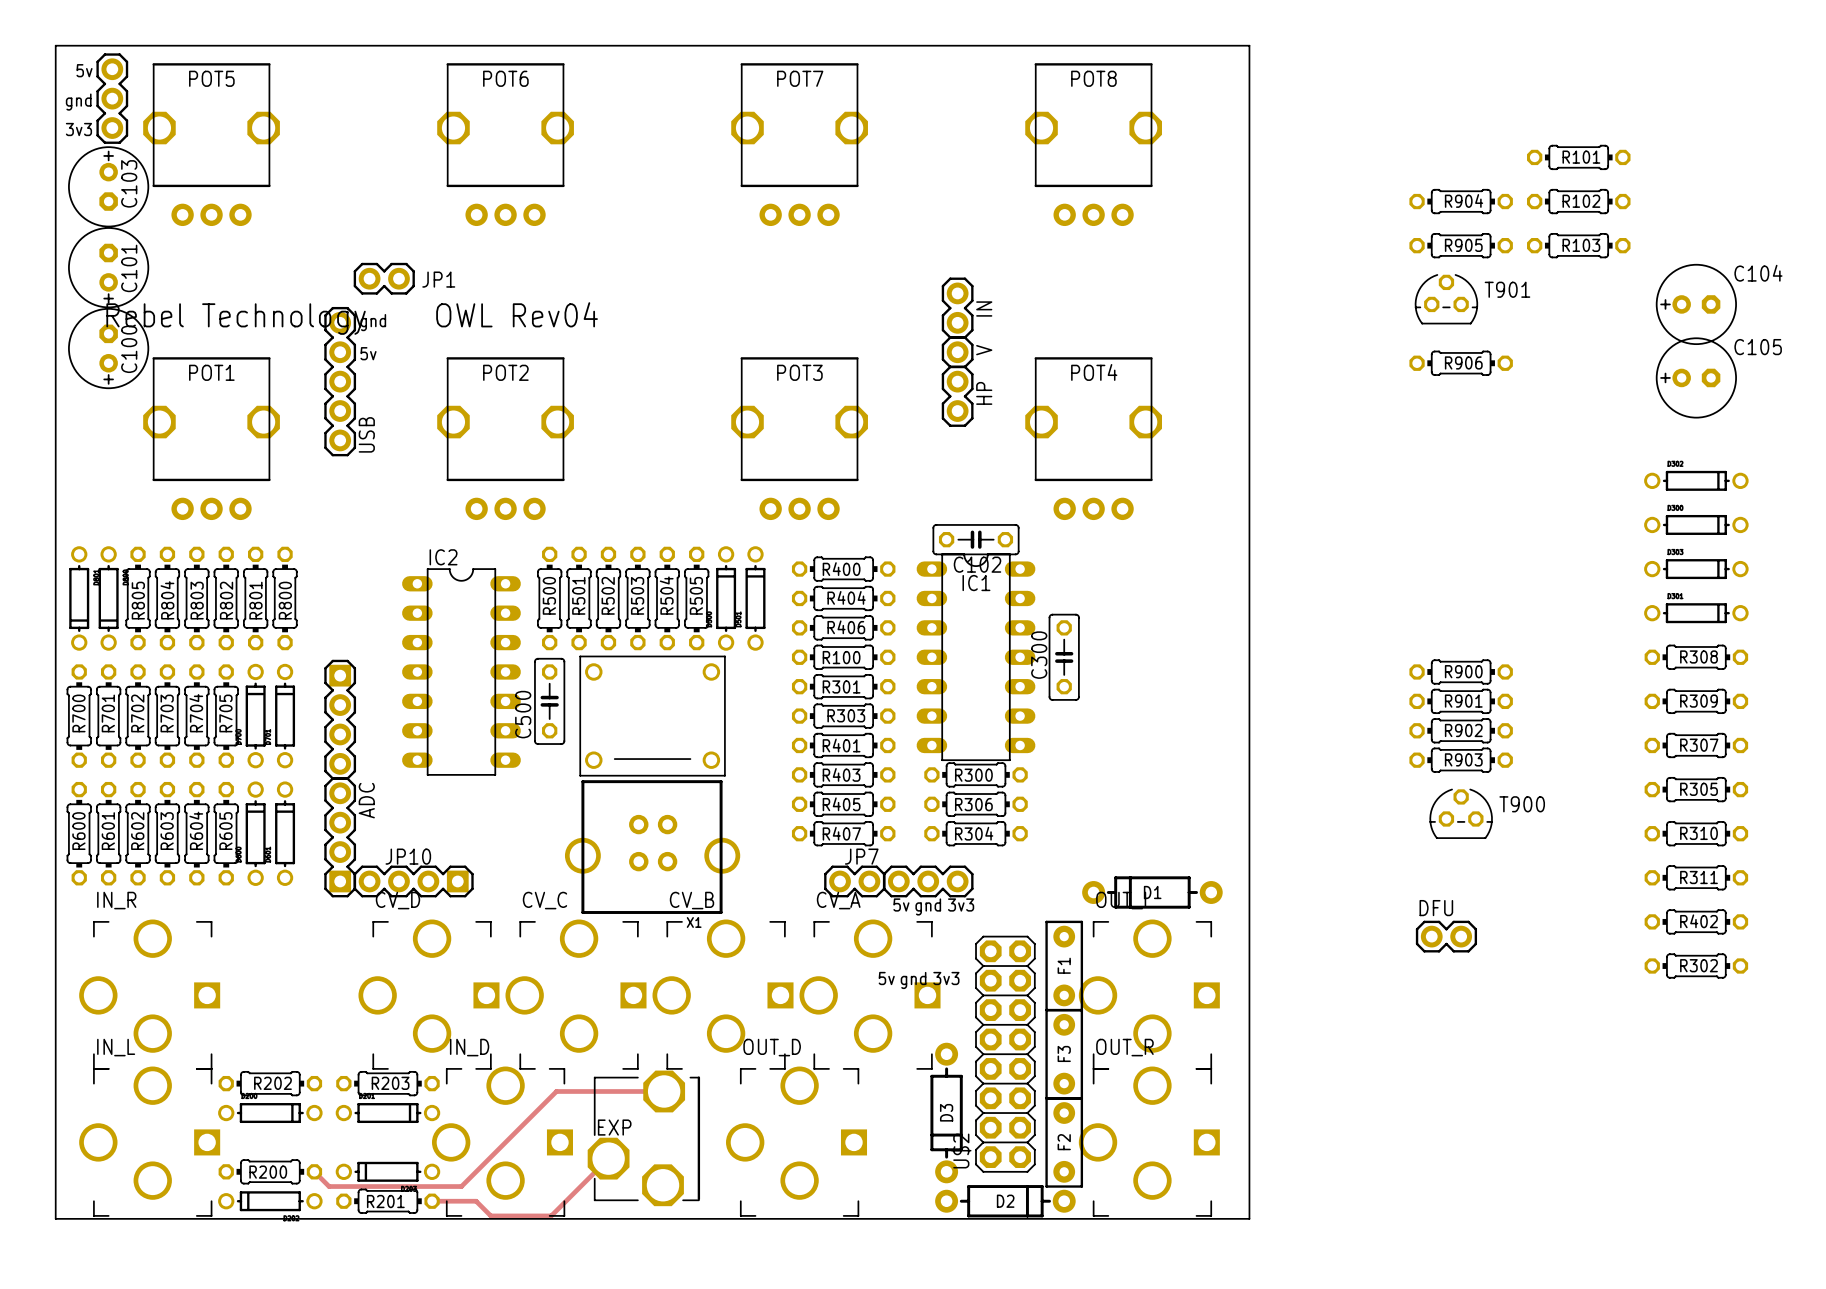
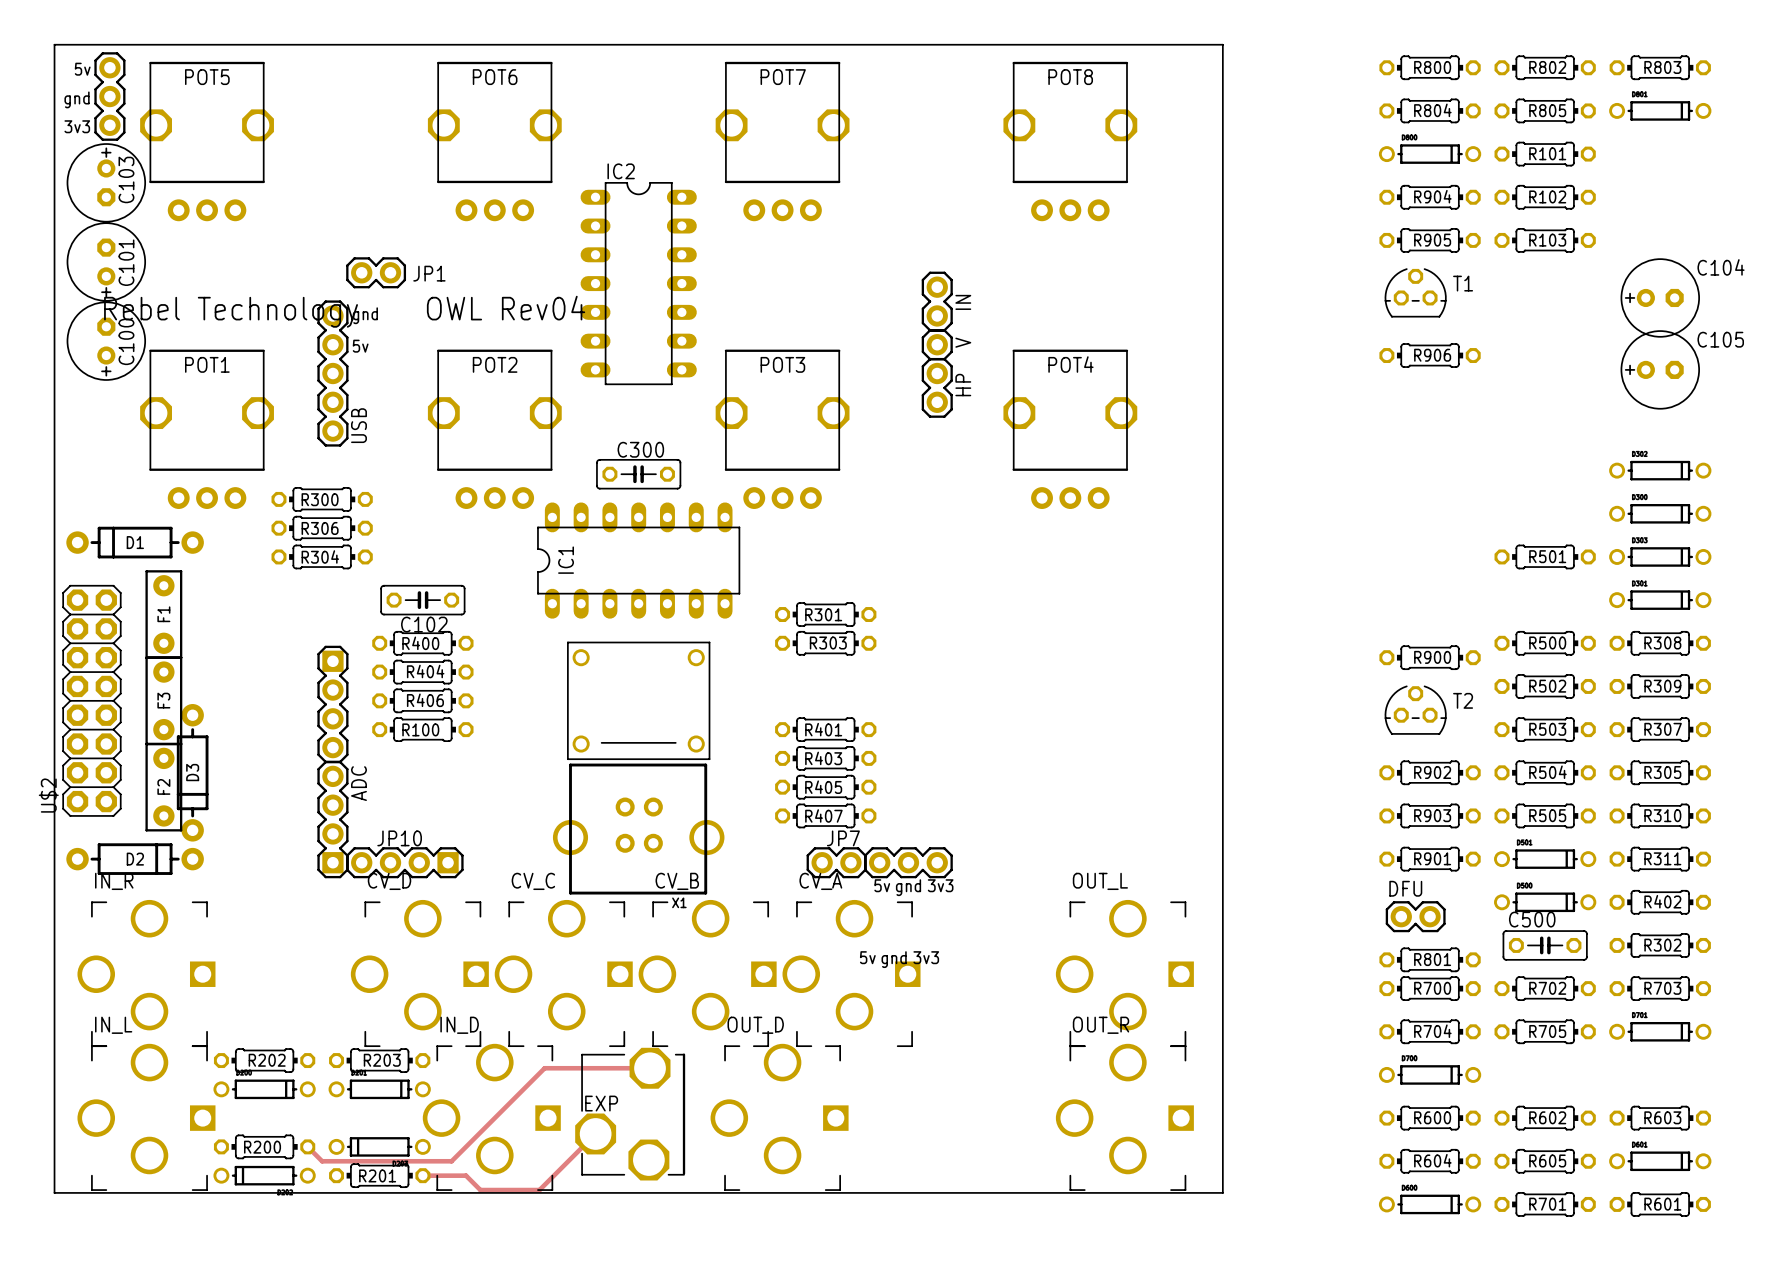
T901 name: T901 (1507, 289) -> T1 (1463, 283)
C102 position: (976, 539) -> (422, 600)
R400 position: (843, 569) -> (422, 643)
part rotation: 0° (79, 598) -> 90° counterclockwise (1660, 110)
part position: (79, 598) -> (1660, 110)
part rotation: 0° (108, 598) -> 90° counterclockwise (1430, 154)
part position: (108, 598) -> (1430, 154)
R805 rotation: 0° (138, 598) -> 90° clockwise (1545, 110)
R805 position: (138, 598) -> (1545, 110)
R804 rotation: 0° (167, 598) -> 90° clockwise (1430, 110)
R804 position: (167, 598) -> (1430, 110)
R803 rotation: 0° (196, 598) -> 90° clockwise (1660, 67)
R803 position: (196, 598) -> (1660, 67)
R802 rotation: 0° (226, 598) -> 90° clockwise (1545, 67)
R802 position: (226, 598) -> (1545, 67)
R801 rotation: 0° (255, 598) -> 90° clockwise (1430, 959)
R801 position: (255, 598) -> (1430, 959)
R800 rotation: 0° (285, 598) -> 90° clockwise (1430, 67)
R800 position: (285, 598) -> (1430, 67)
R500 rotation: 0° (549, 598) -> 90° clockwise (1545, 643)
R500 position: (549, 598) -> (1545, 643)
R501 rotation: 0° (579, 598) -> 90° clockwise (1545, 556)
R501 position: (579, 598) -> (1545, 556)
R502 rotation: 0° (608, 598) -> 90° clockwise (1545, 686)
R502 position: (608, 598) -> (1545, 686)
R503 rotation: 0° (637, 598) -> 90° clockwise (1545, 729)
R503 position: (637, 598) -> (1545, 729)
R504 rotation: 0° (667, 598) -> 90° clockwise (1545, 772)
R504 position: (667, 598) -> (1545, 772)
R505 rotation: 0° (696, 598) -> 90° clockwise (1545, 815)
R505 position: (696, 598) -> (1545, 815)
part rotation: 0° (726, 598) -> 90° clockwise (1545, 902)
part position: (726, 598) -> (1545, 902)
part rotation: 0° (755, 598) -> 90° clockwise (1545, 859)
part position: (755, 598) -> (1545, 859)
R404 position: (843, 598) -> (422, 672)
R406 name: R406 (846, 627) -> R301 (823, 614)
R100 name: R100 (841, 657) -> R303 (828, 643)
IC1 rotation: 0° (976, 657) -> 90° counterclockwise (638, 560)
IC1 position: (976, 657) -> (638, 560)
C300 rotation: 0° (1064, 657) -> 90° clockwise (638, 474)
C300 position: (1064, 657) -> (638, 474)
IC2 position: (461, 671) -> (638, 283)
R301: (843, 686) -> none
C500 rotation: 0° (549, 701) -> 90° clockwise (1545, 945)
C500 position: (549, 701) -> (1545, 945)
R901 position: (1461, 701) -> (1430, 859)
R700 rotation: 0° (79, 716) -> 90° clockwise (1430, 988)
R700 position: (79, 716) -> (1430, 988)
R701 rotation: 0° (108, 716) -> 90° clockwise (1545, 1204)
R701 position: (108, 716) -> (1545, 1204)
R702 rotation: 0° (138, 716) -> 90° clockwise (1545, 988)
R702 position: (138, 716) -> (1545, 988)
R703 rotation: 0° (167, 716) -> 90° clockwise (1660, 988)
R703 position: (167, 716) -> (1660, 988)
R704 rotation: 0° (196, 716) -> 90° clockwise (1430, 1031)
R704 position: (196, 716) -> (1430, 1031)
R705 rotation: 0° (226, 716) -> 90° clockwise (1545, 1031)
R705 position: (226, 716) -> (1545, 1031)
part rotation: 0° (255, 716) -> 90° clockwise (1430, 1074)
part position: (255, 716) -> (1430, 1074)
part rotation: 0° (285, 716) -> 90° clockwise (1660, 1031)
part position: (285, 716) -> (1660, 1031)
R406: none -> (422, 700)
R303: (843, 716) -> none
T2: none -> (1415, 710)
R902 position: (1461, 730) -> (1430, 772)
R100: none -> (422, 729)
R903 position: (1461, 760) -> (1430, 815)
R300 position: (976, 774) -> (322, 499)
R306 position: (976, 804) -> (322, 528)
T900: (1461, 813) -> none
R600 rotation: 0° (79, 833) -> 90° clockwise (1430, 1118)
R600 position: (79, 833) -> (1430, 1118)
R601 rotation: 0° (108, 833) -> 90° clockwise (1660, 1204)
R601 position: (108, 833) -> (1660, 1204)
R602 rotation: 0° (138, 833) -> 90° clockwise (1545, 1118)
R602 position: (138, 833) -> (1545, 1118)
R603 rotation: 0° (167, 833) -> 90° clockwise (1660, 1118)
R603 position: (167, 833) -> (1660, 1118)
R604 rotation: 0° (196, 833) -> 90° clockwise (1430, 1161)
R604 position: (196, 833) -> (1430, 1161)
R605 rotation: 0° (226, 833) -> 90° clockwise (1545, 1161)
R605 position: (226, 833) -> (1545, 1161)
part rotation: 0° (255, 833) -> 90° clockwise (1430, 1204)
part position: (255, 833) -> (1430, 1204)
part rotation: 0° (285, 833) -> 90° clockwise (1660, 1161)
part position: (285, 833) -> (1660, 1161)
R304 position: (976, 833) -> (322, 556)
D1 position: (1152, 892) -> (135, 542)
F1 position: (1064, 966) -> (163, 614)
U$2 position: (1005, 1054) -> (91, 700)
F3 position: (1064, 1054) -> (163, 700)
D3 position: (946, 1113) -> (192, 772)
F2 position: (1064, 1142) -> (163, 787)
D2 position: (1005, 1201) -> (135, 859)

